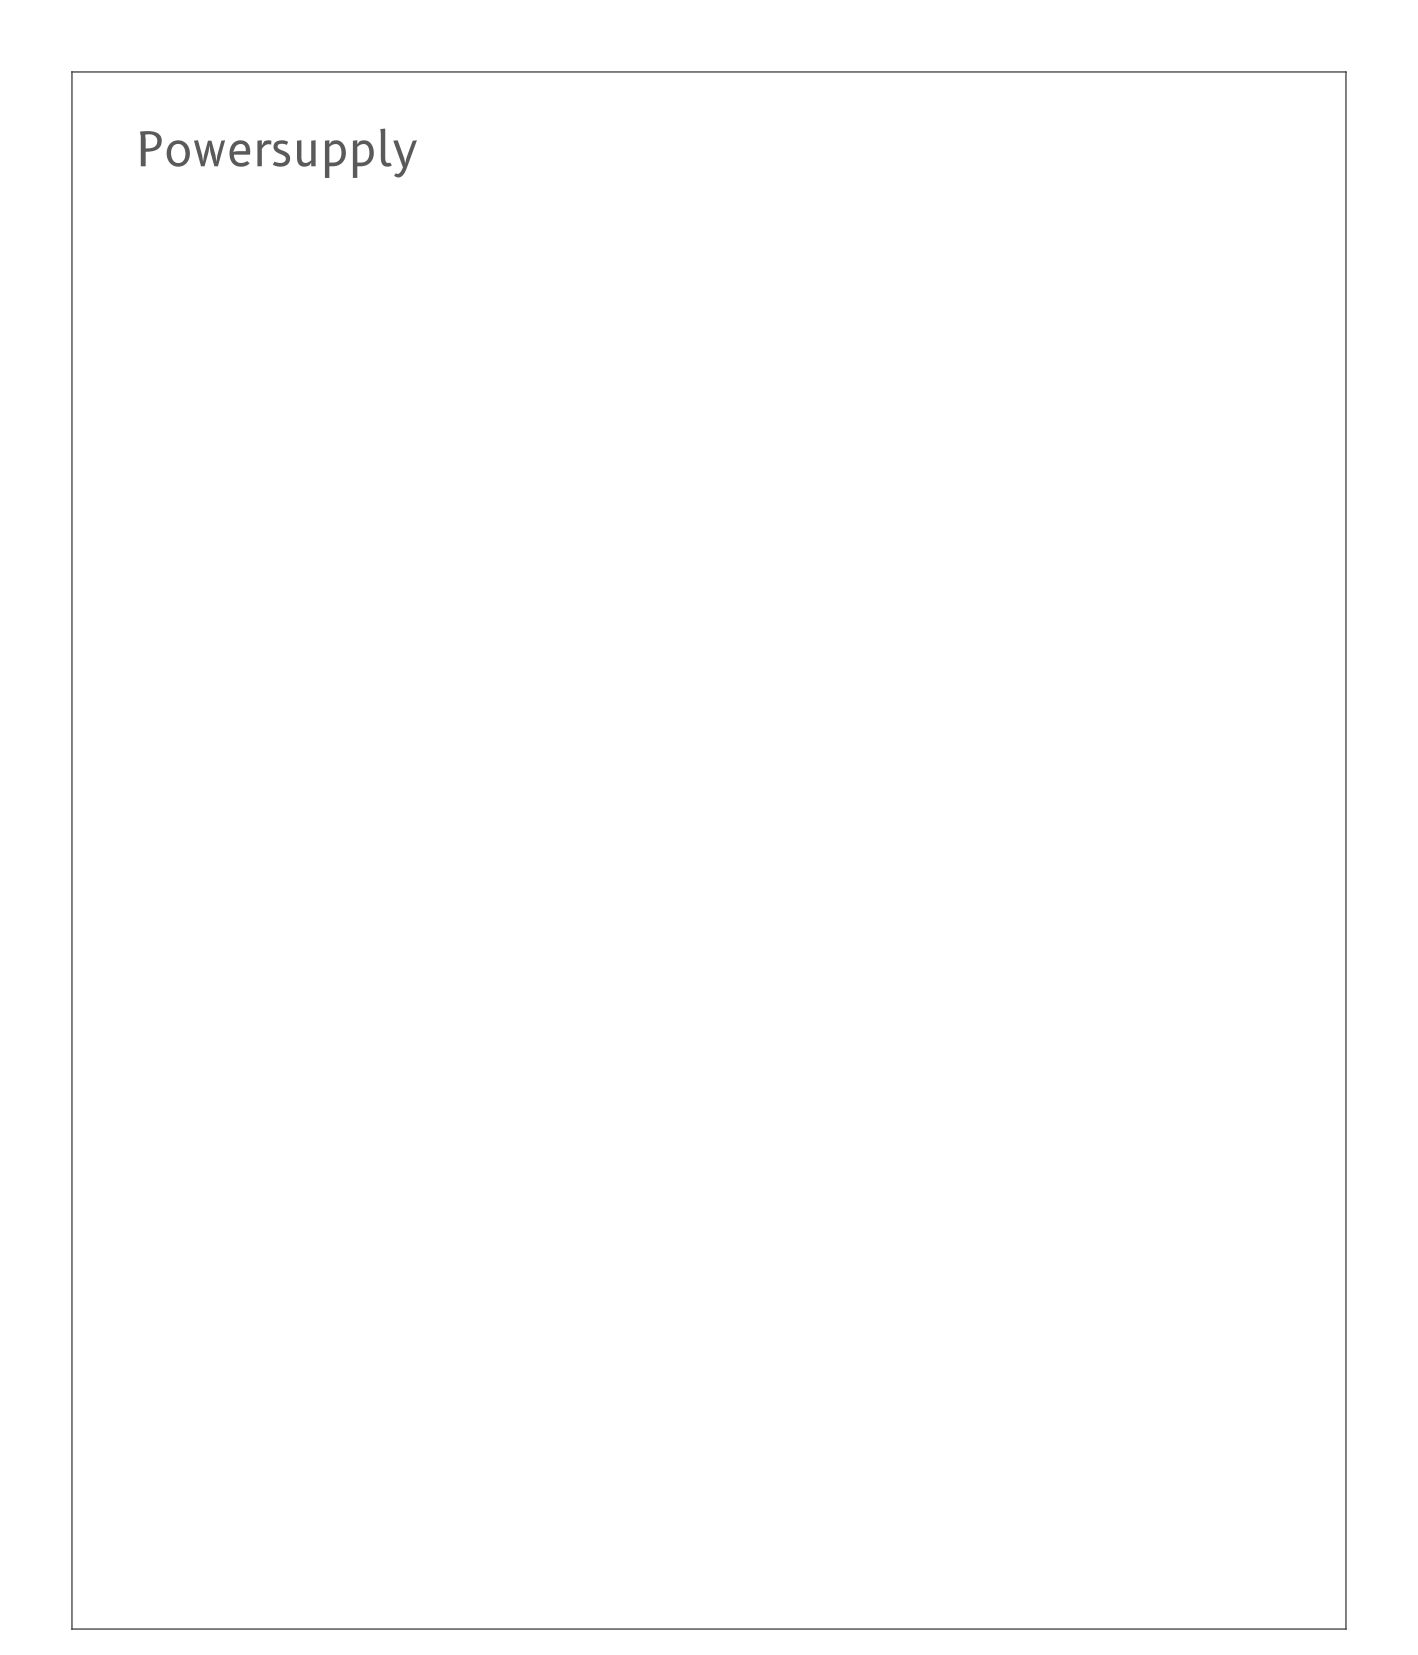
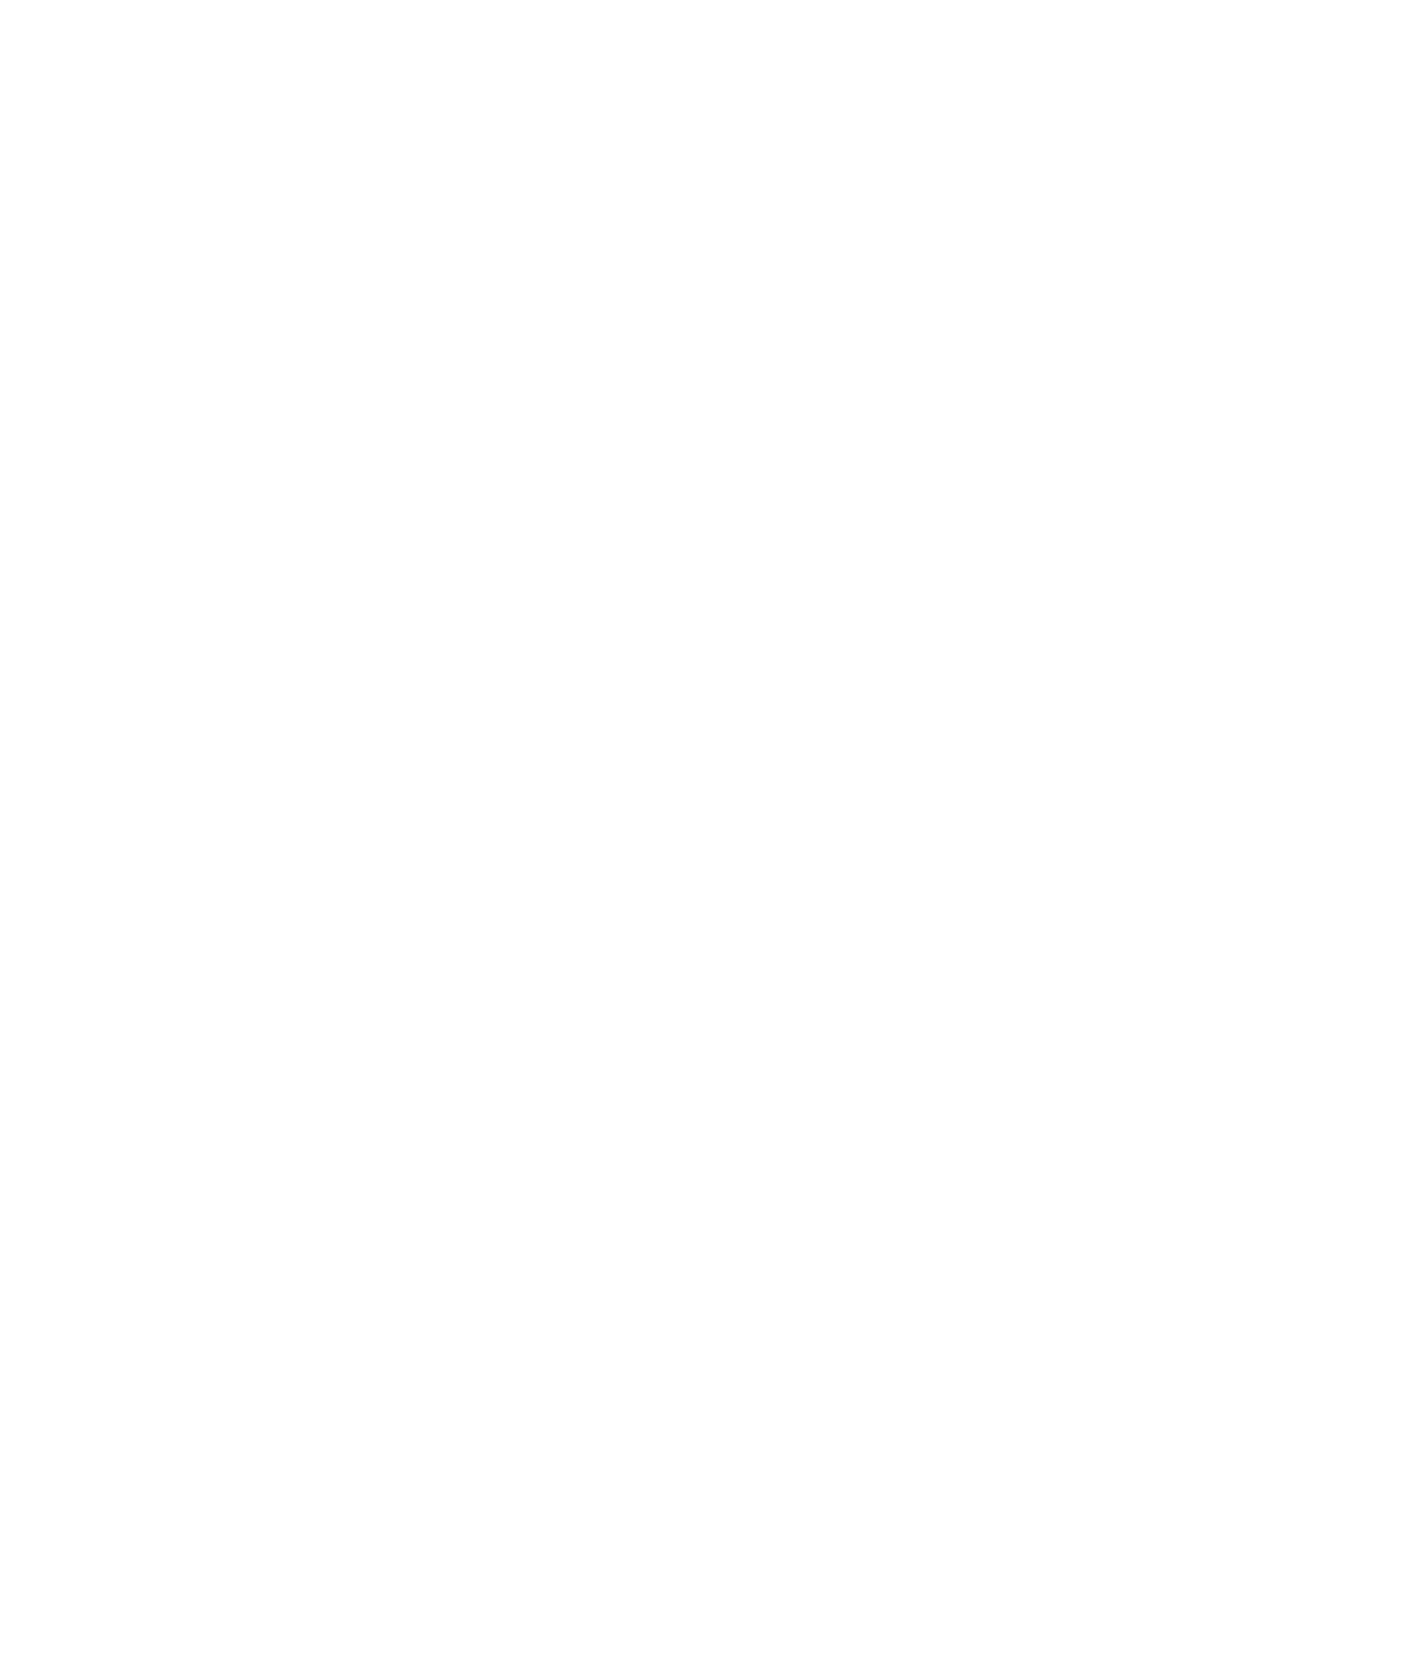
line: (71, 71) (1345, 71) (1345, 1629) (71, 1629) (71, 71) -> none
text: Powersupply (278, 153) -> none

